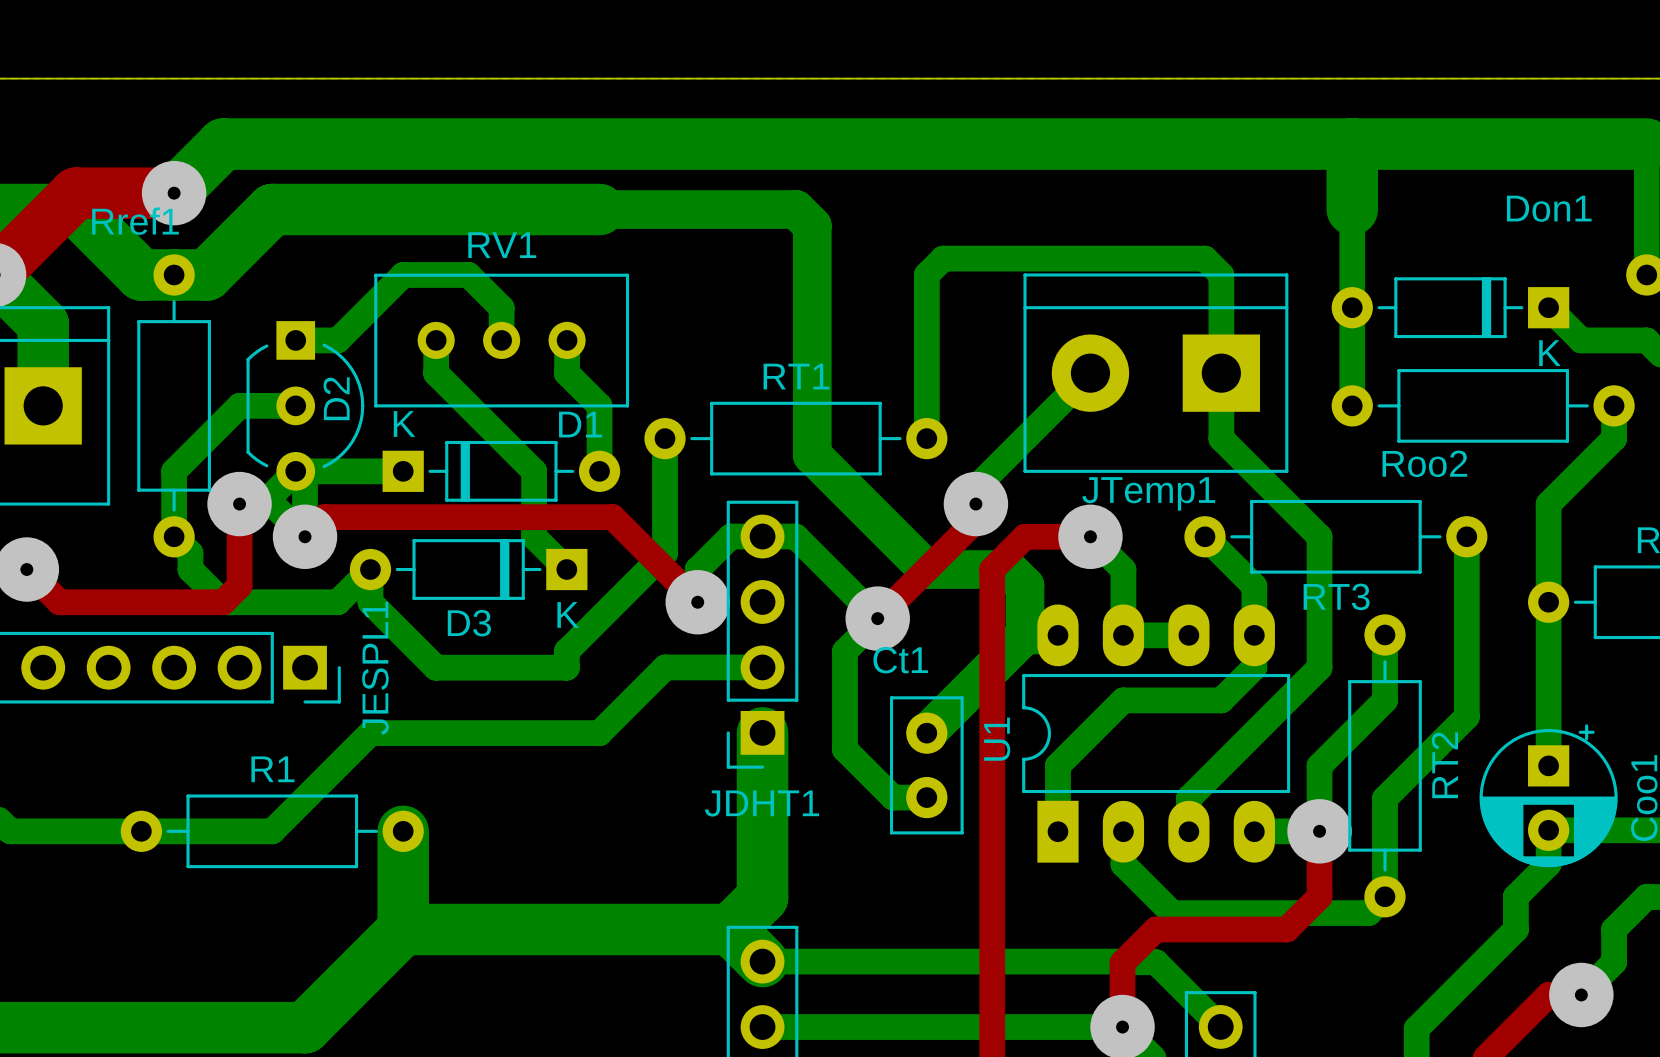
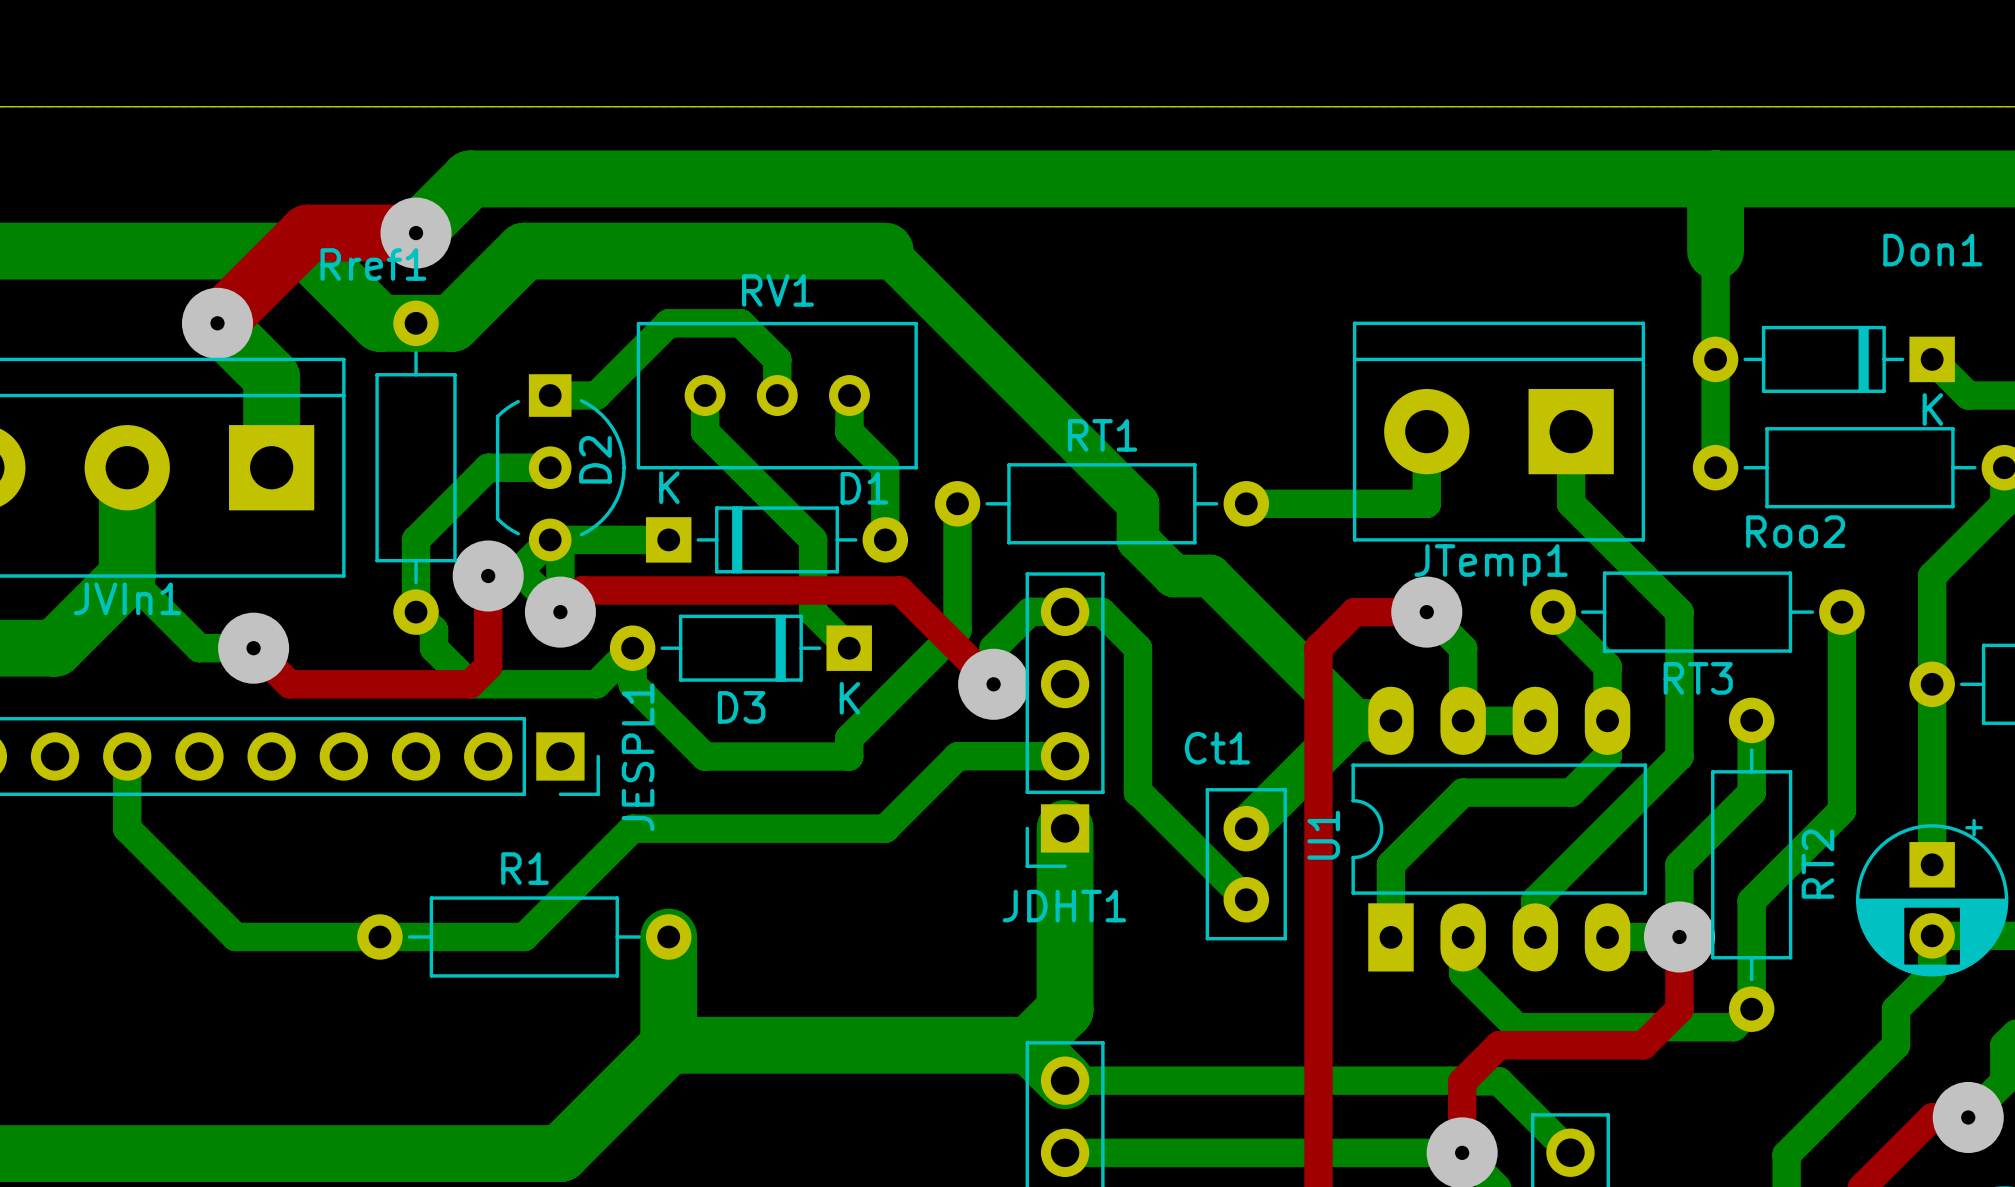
bottom track: (599, 209) (795, 209) (812, 225) (812, 454) (828, 471) -> (885, 251) (1137, 503) (1137, 539)
bottom track: (1090, 373) (975, 487) (975, 504) -> (1426, 431) (1426, 503) (1246, 503)
bottom track: (1221, 373) (1221, 274) (1205, 258) (943, 258) (926, 274) (926, 438) -> none
bottom track: (861, 504) (926, 569) (1008, 569) (1025, 585) (1025, 634) -> (1174, 576) (1210, 576) (1354, 720)
top track: (975, 504) (975, 520) (877, 618) -> none
via: (975, 504) -> none
bottom track: (828, 569) (877, 618) (845, 651) (845, 749) (893, 797) (926, 797) -> (1137, 648) (1137, 792) (1246, 899)
via: (877, 618) -> none

